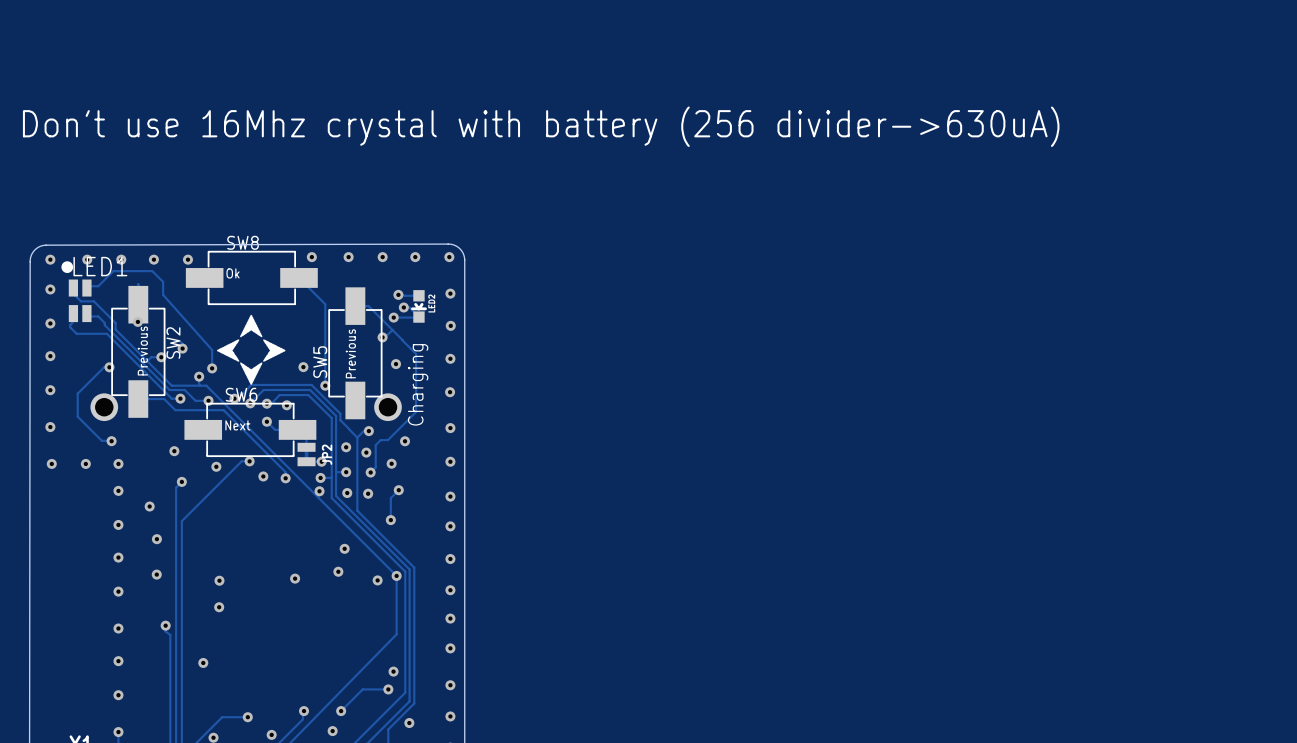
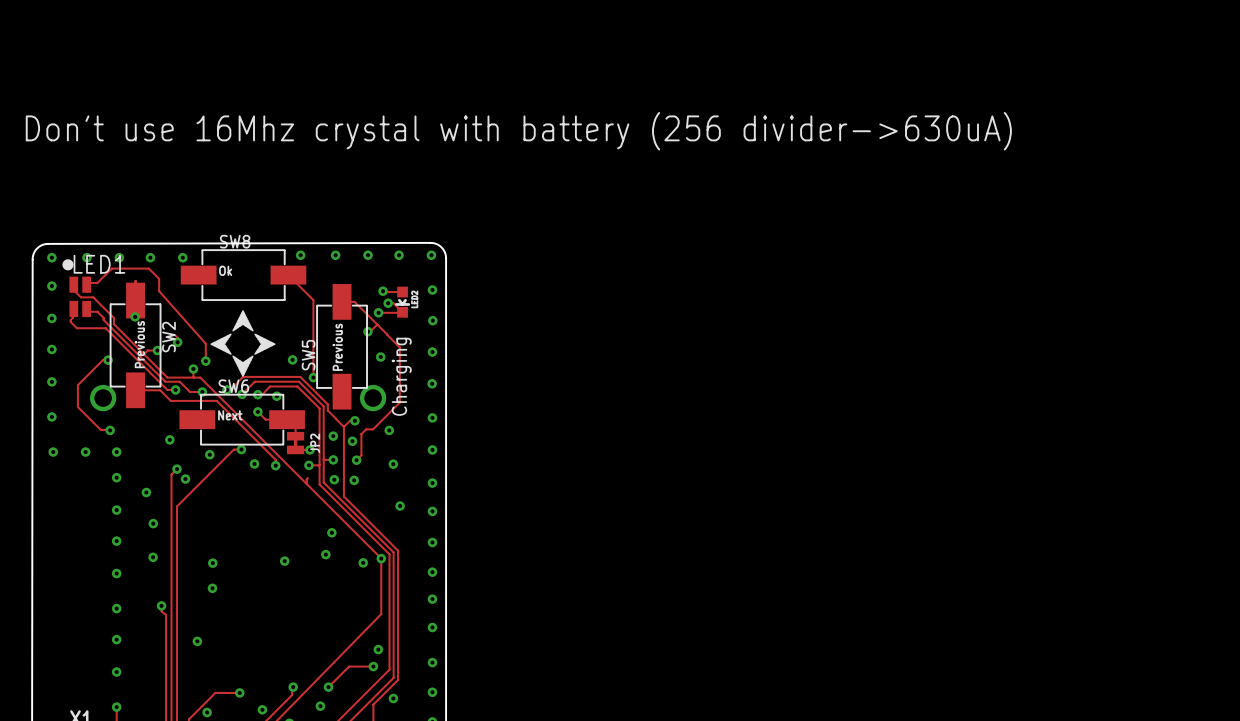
via: (391, 463) -> none
via: none -> (393, 464)
track: (398, 490) (390, 498) (390, 520) -> none
via: (398, 490) -> none
via: (319, 491) -> none
via: none -> (185, 479)
via: (390, 520) -> none
via: none -> (400, 506)

